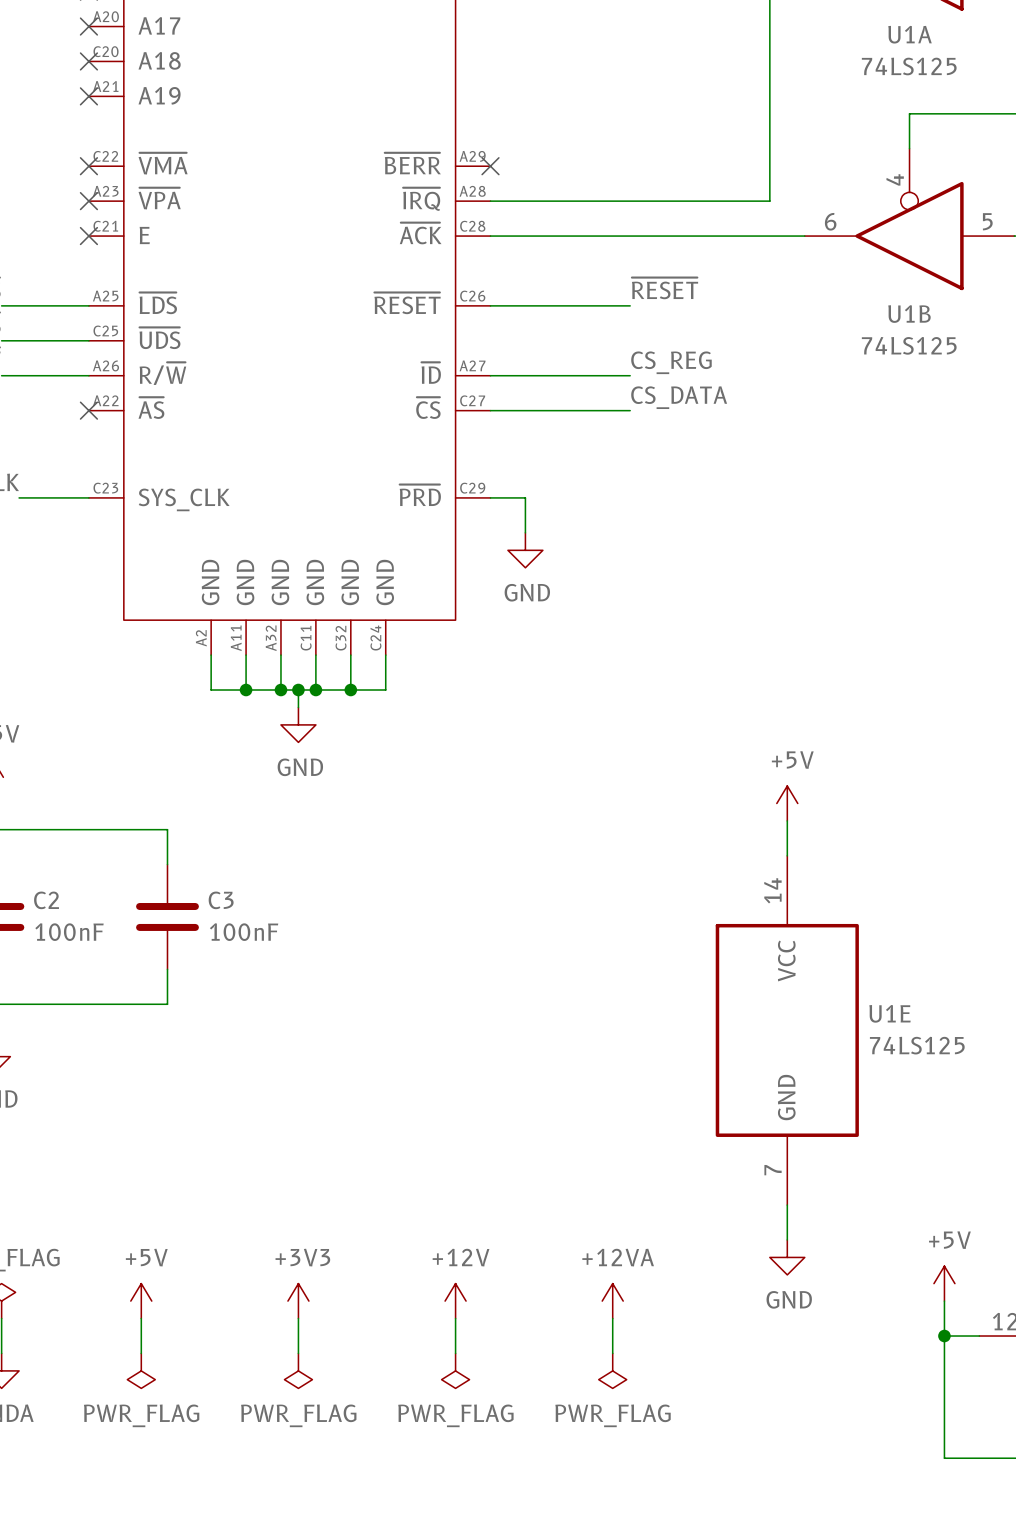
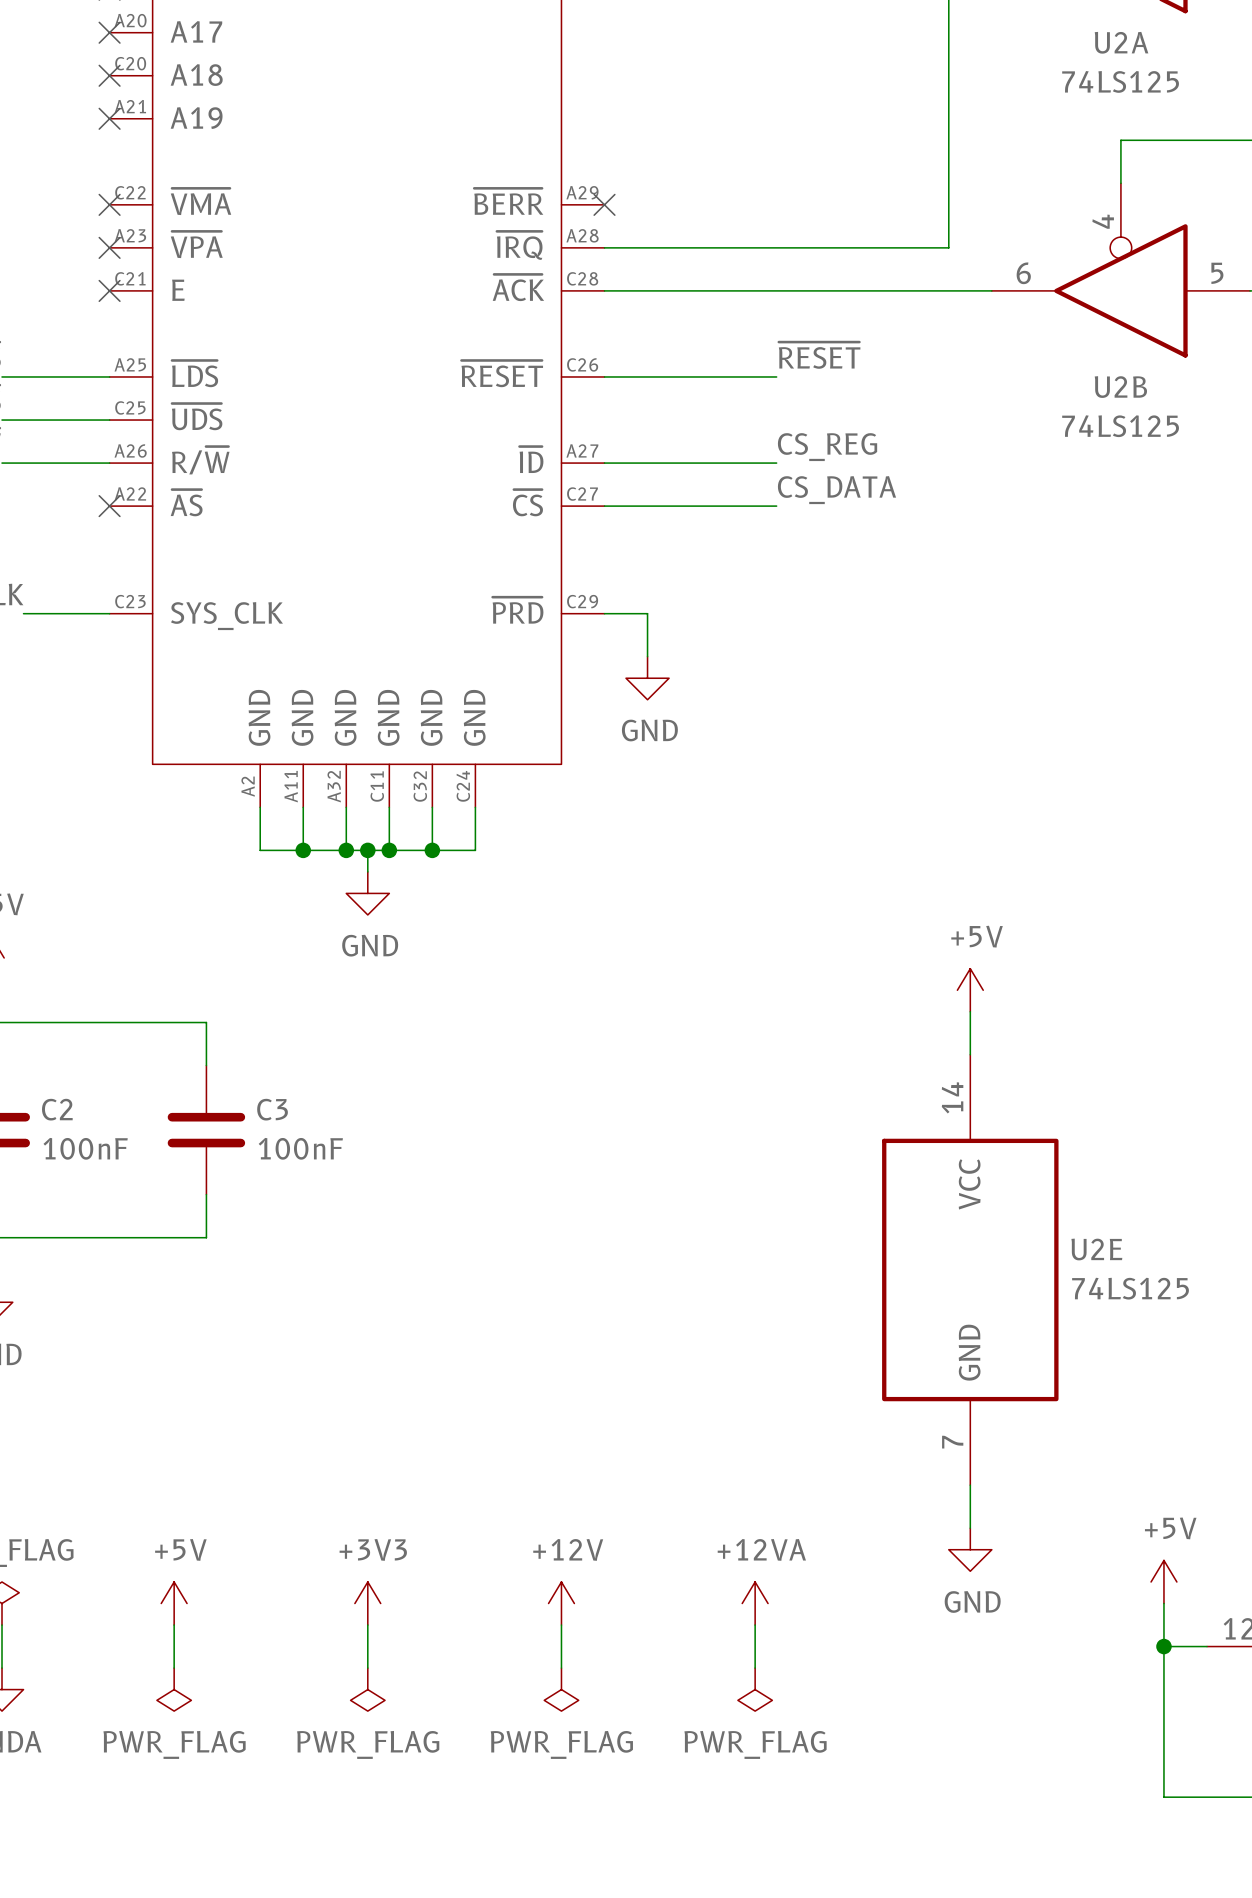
U1A name: U1A (910, 34) -> U2A (1121, 42)
U1B name: U1B (909, 314) -> U2B (1120, 387)
U1E name: U1E (889, 1013) -> U2E (1096, 1249)

